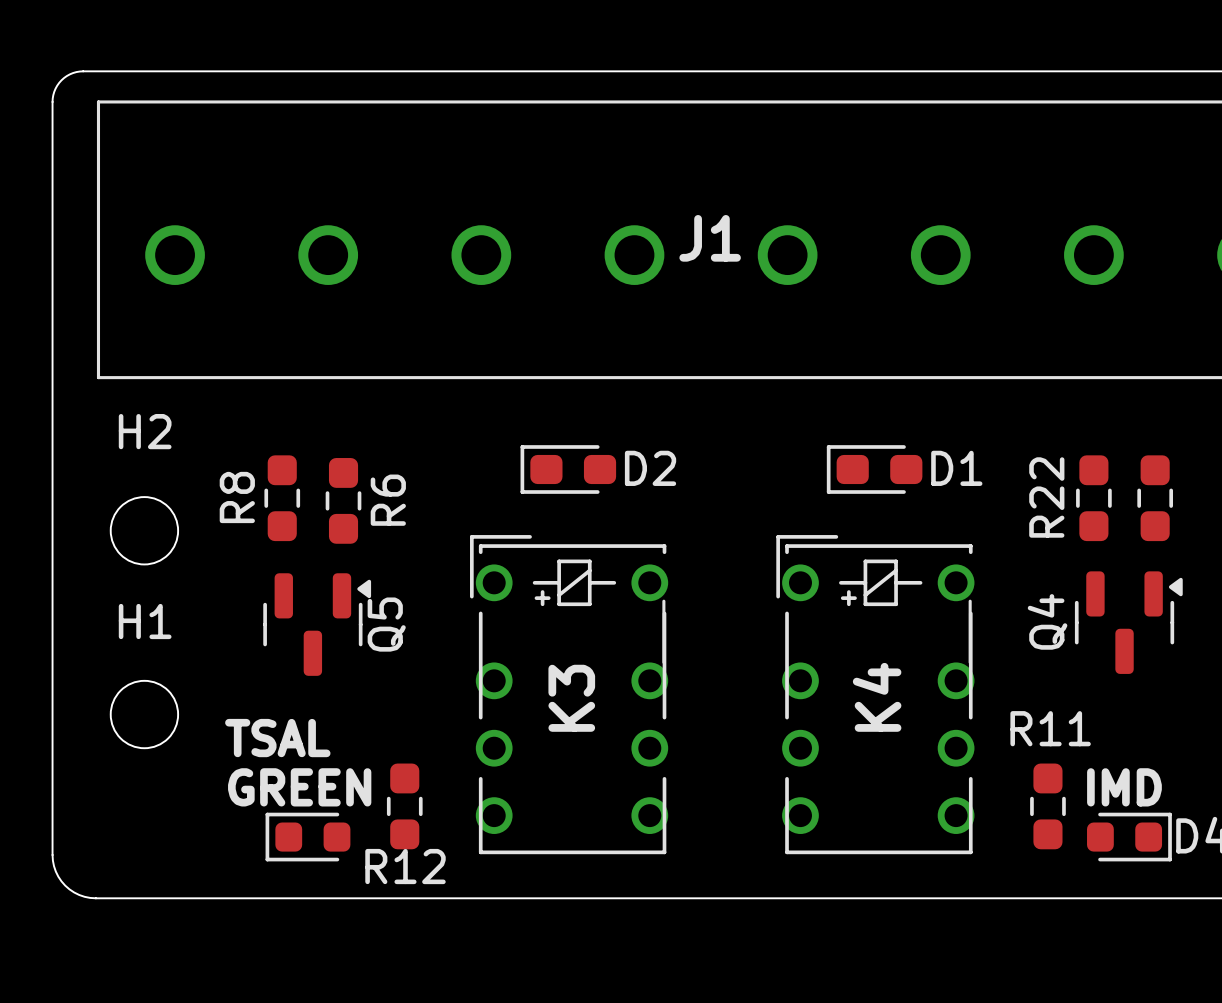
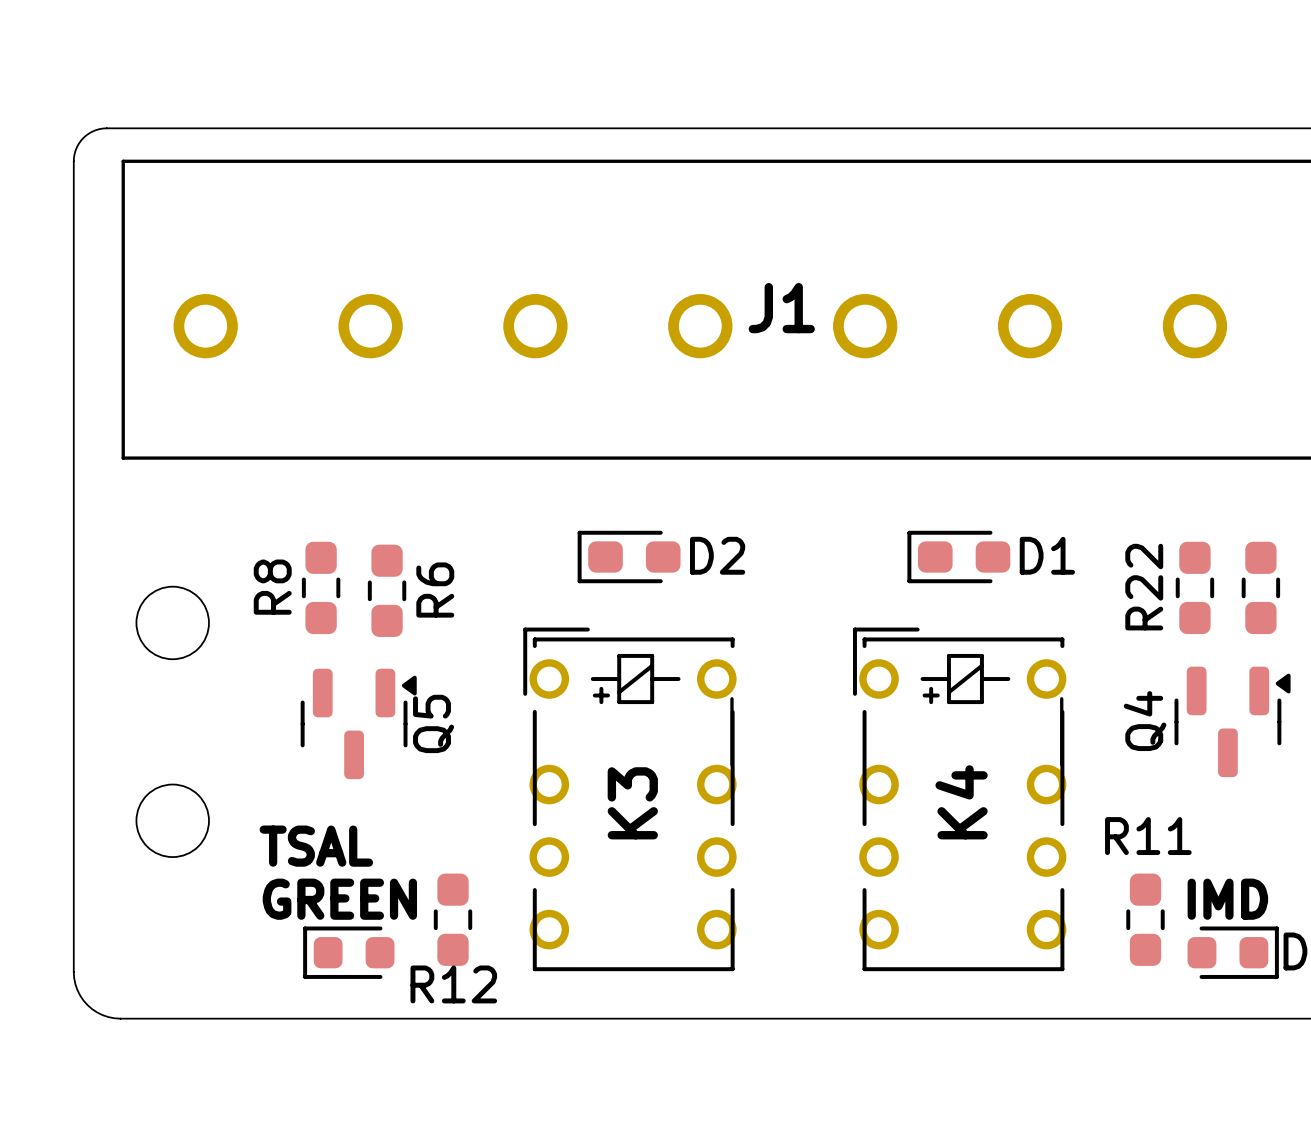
H2 name: H2 (145, 431) -> none
H1 name: H1 (145, 621) -> none

